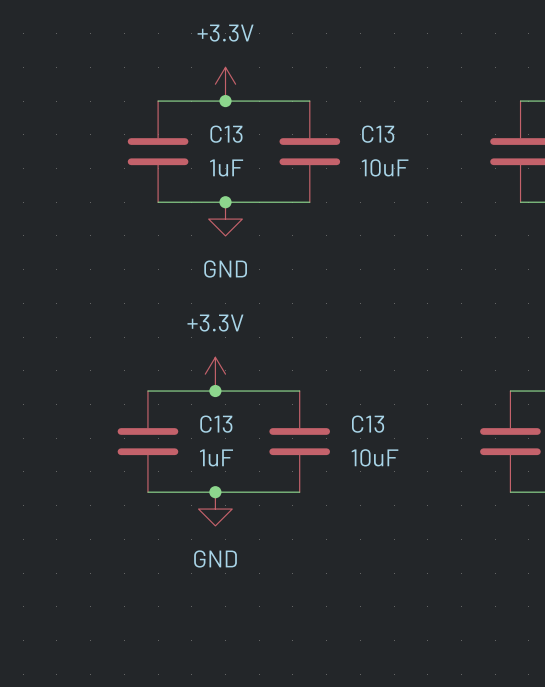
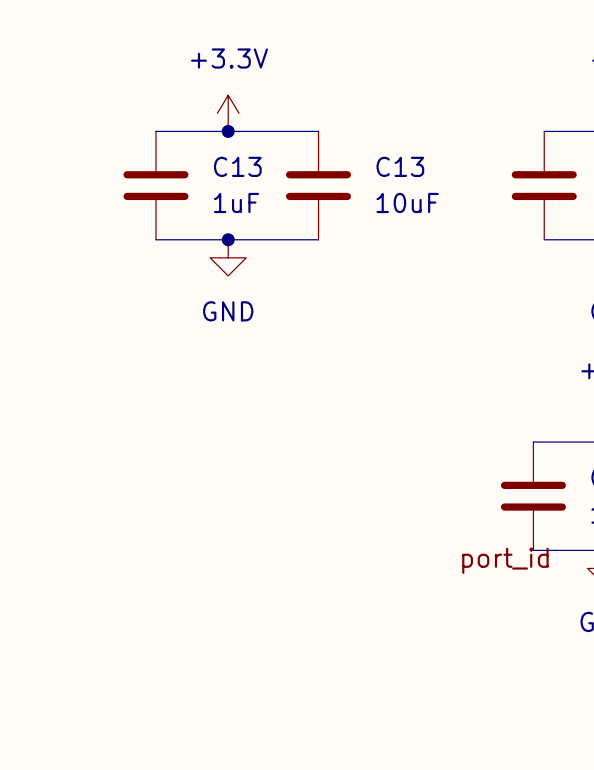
power symbol: +3.3V (215, 374) -> none
wire: (147, 391) (299, 391) -> none
junction: (215, 391) -> none
C13: 1uF (147, 441) -> none
C13: 10uF (299, 441) -> none
wire: (147, 492) (299, 492) -> none
junction: (215, 492) -> none
label: none -> port_id (505, 560)
power symbol: GND (215, 509) -> none

